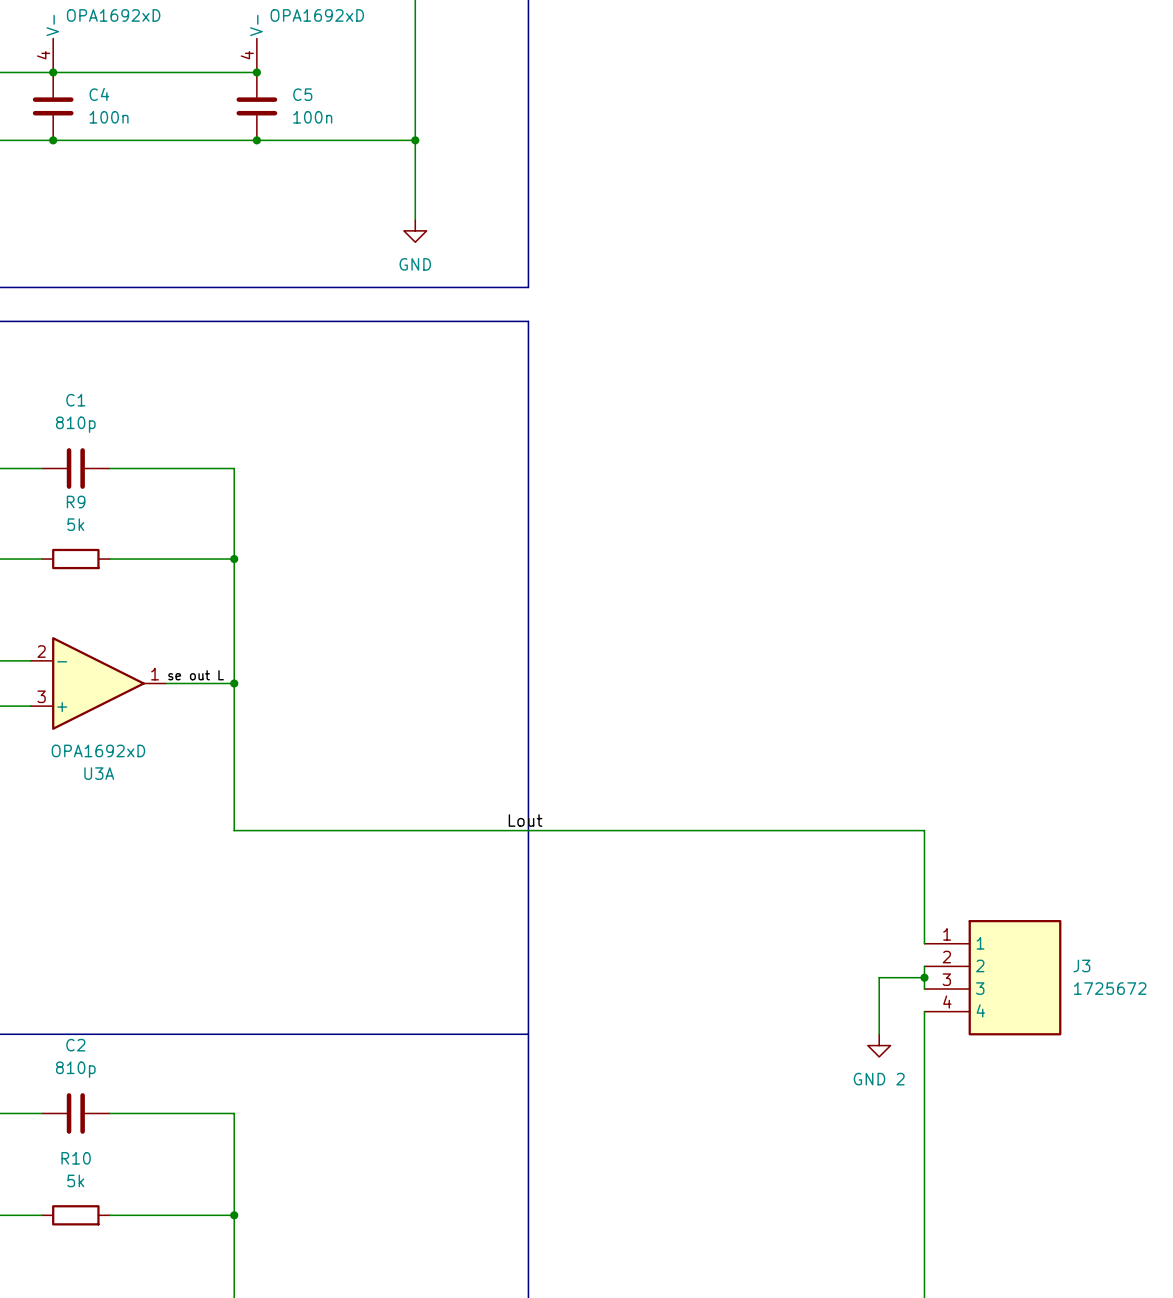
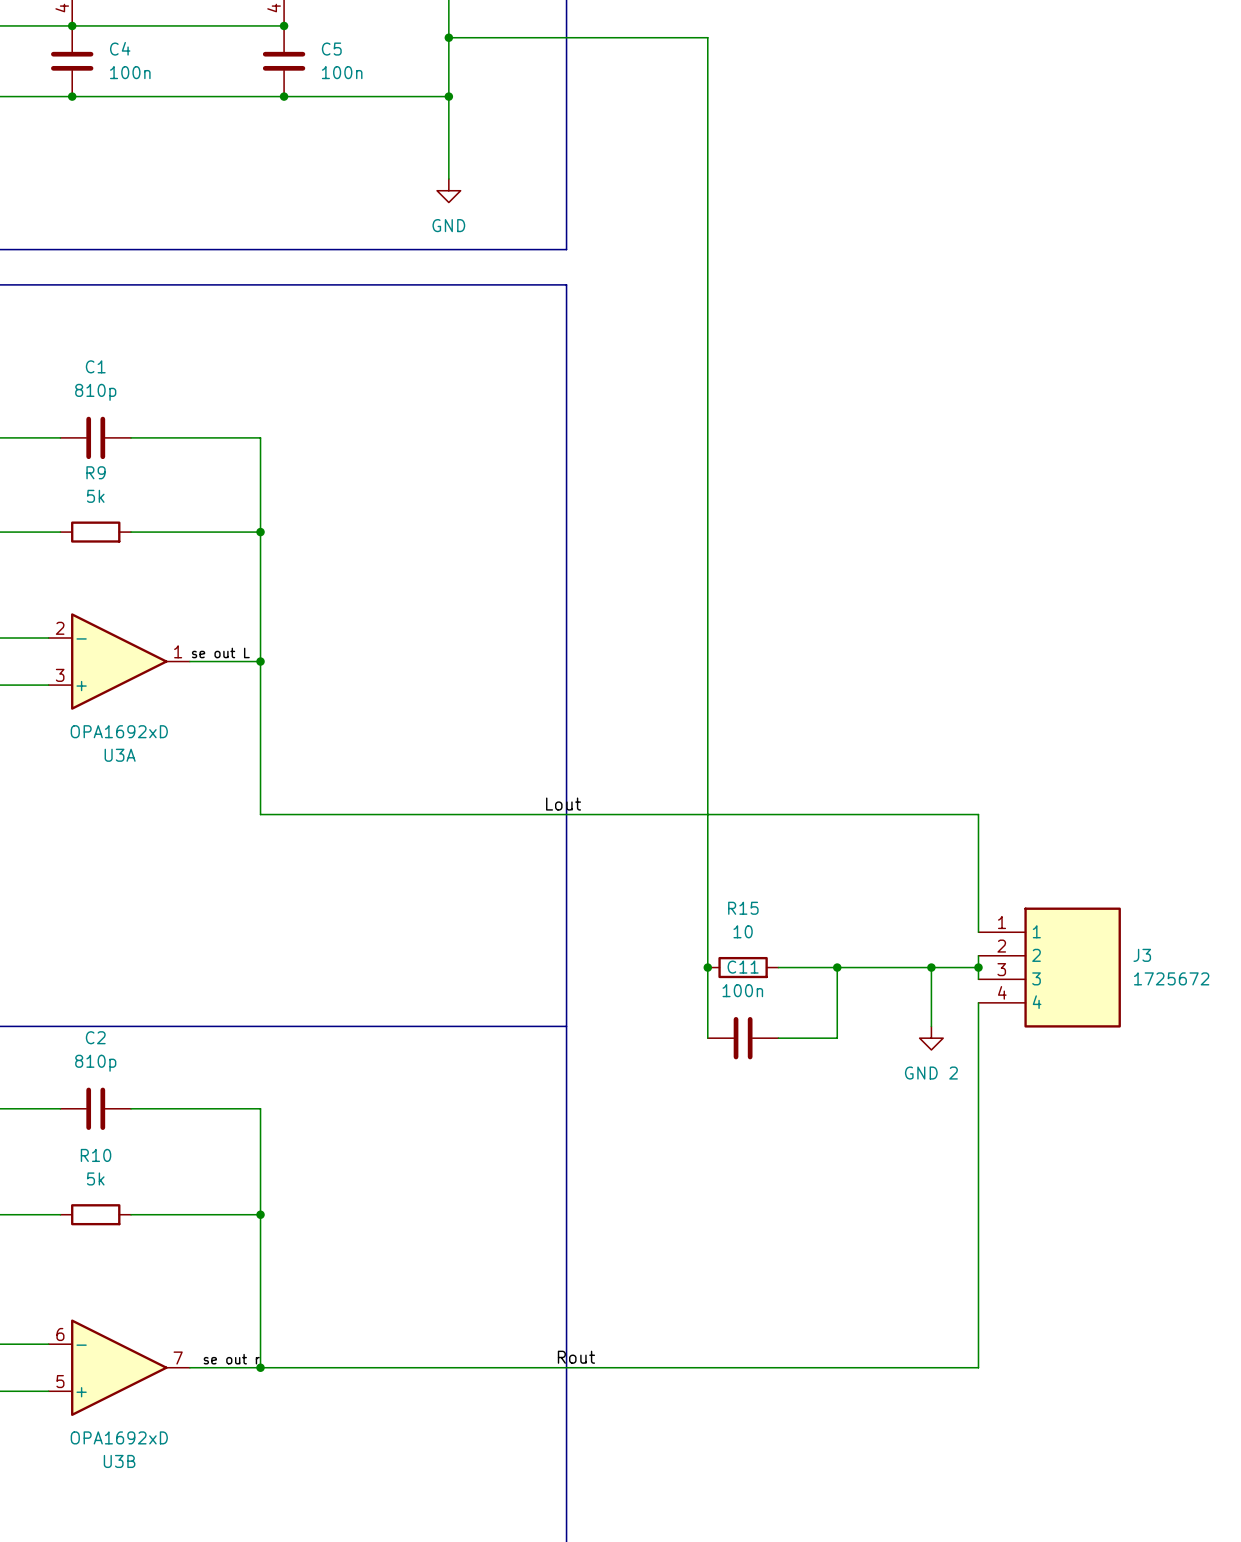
wire: none -> (448, 37) (707, 37) (707, 1038)
junction: none -> (448, 37)
junction: none -> (707, 967)
R15: none -> 10 (743, 967)
wire: none -> (778, 967) (931, 967)
wire: none -> (837, 967) (837, 1038) (778, 1038)
junction: none -> (837, 967)
junction: none -> (931, 967)
C11: none -> 100n (743, 1038)

